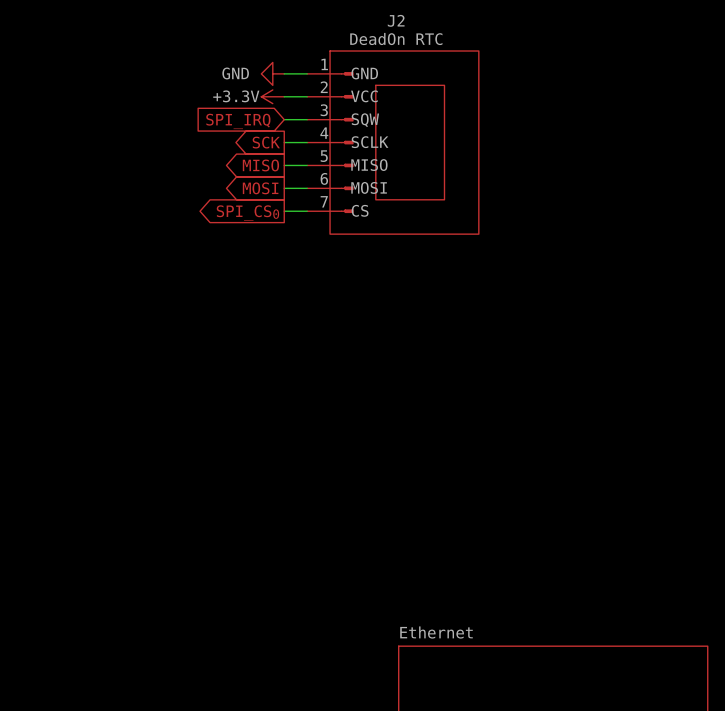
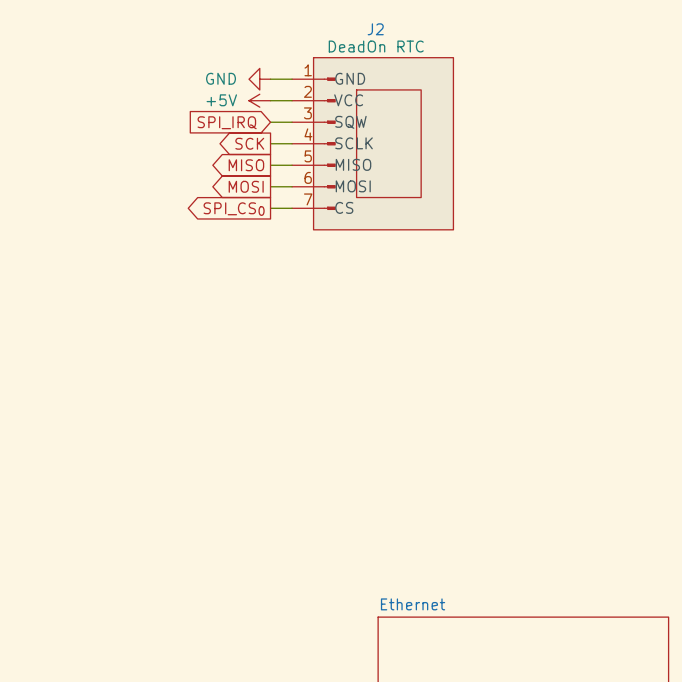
power symbol: +3.3V (272, 96) -> +5V (259, 100)

